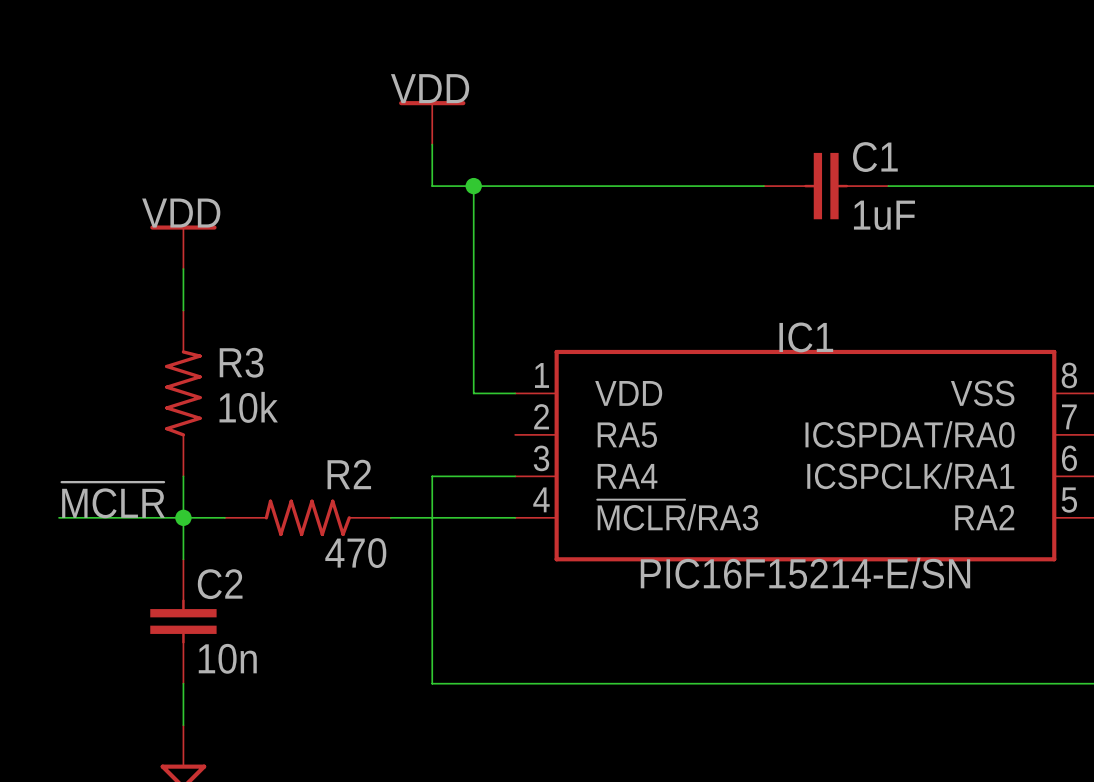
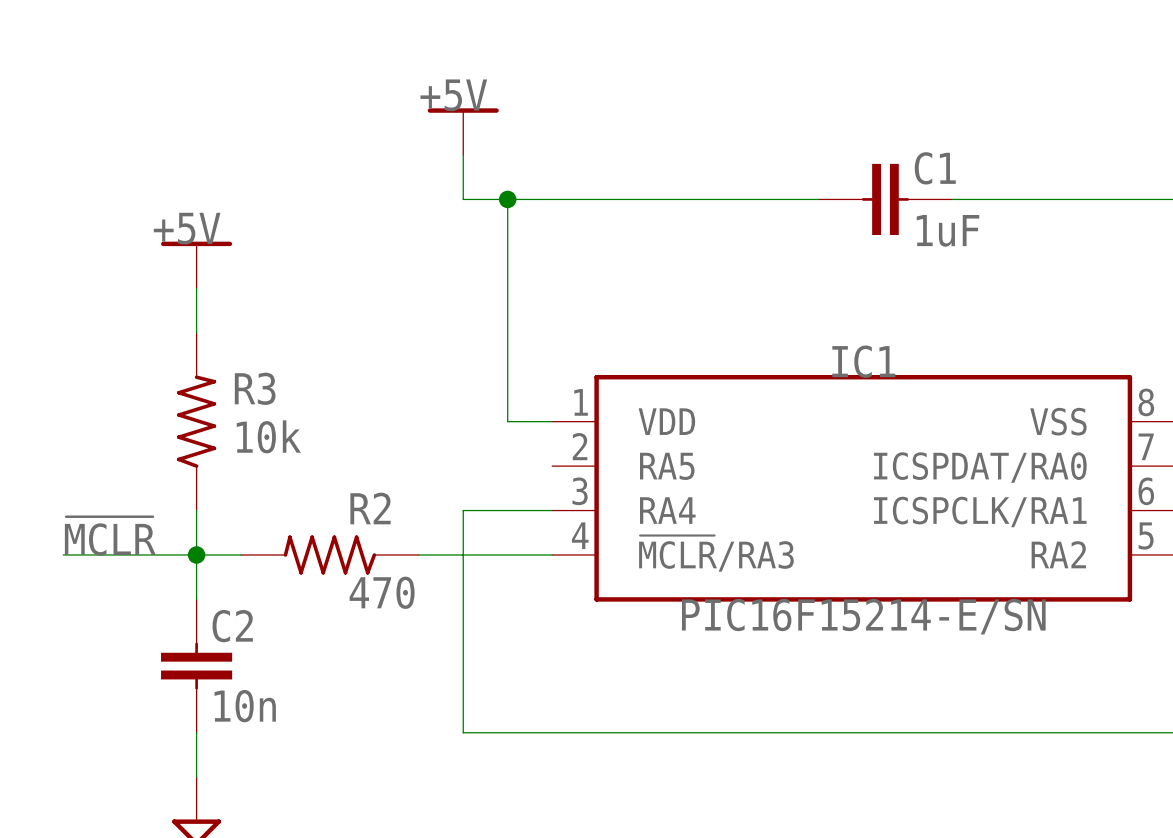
power symbol: VDD (432, 122) -> +5V (463, 131)
power symbol: VDD (183, 247) -> +5V (196, 264)

